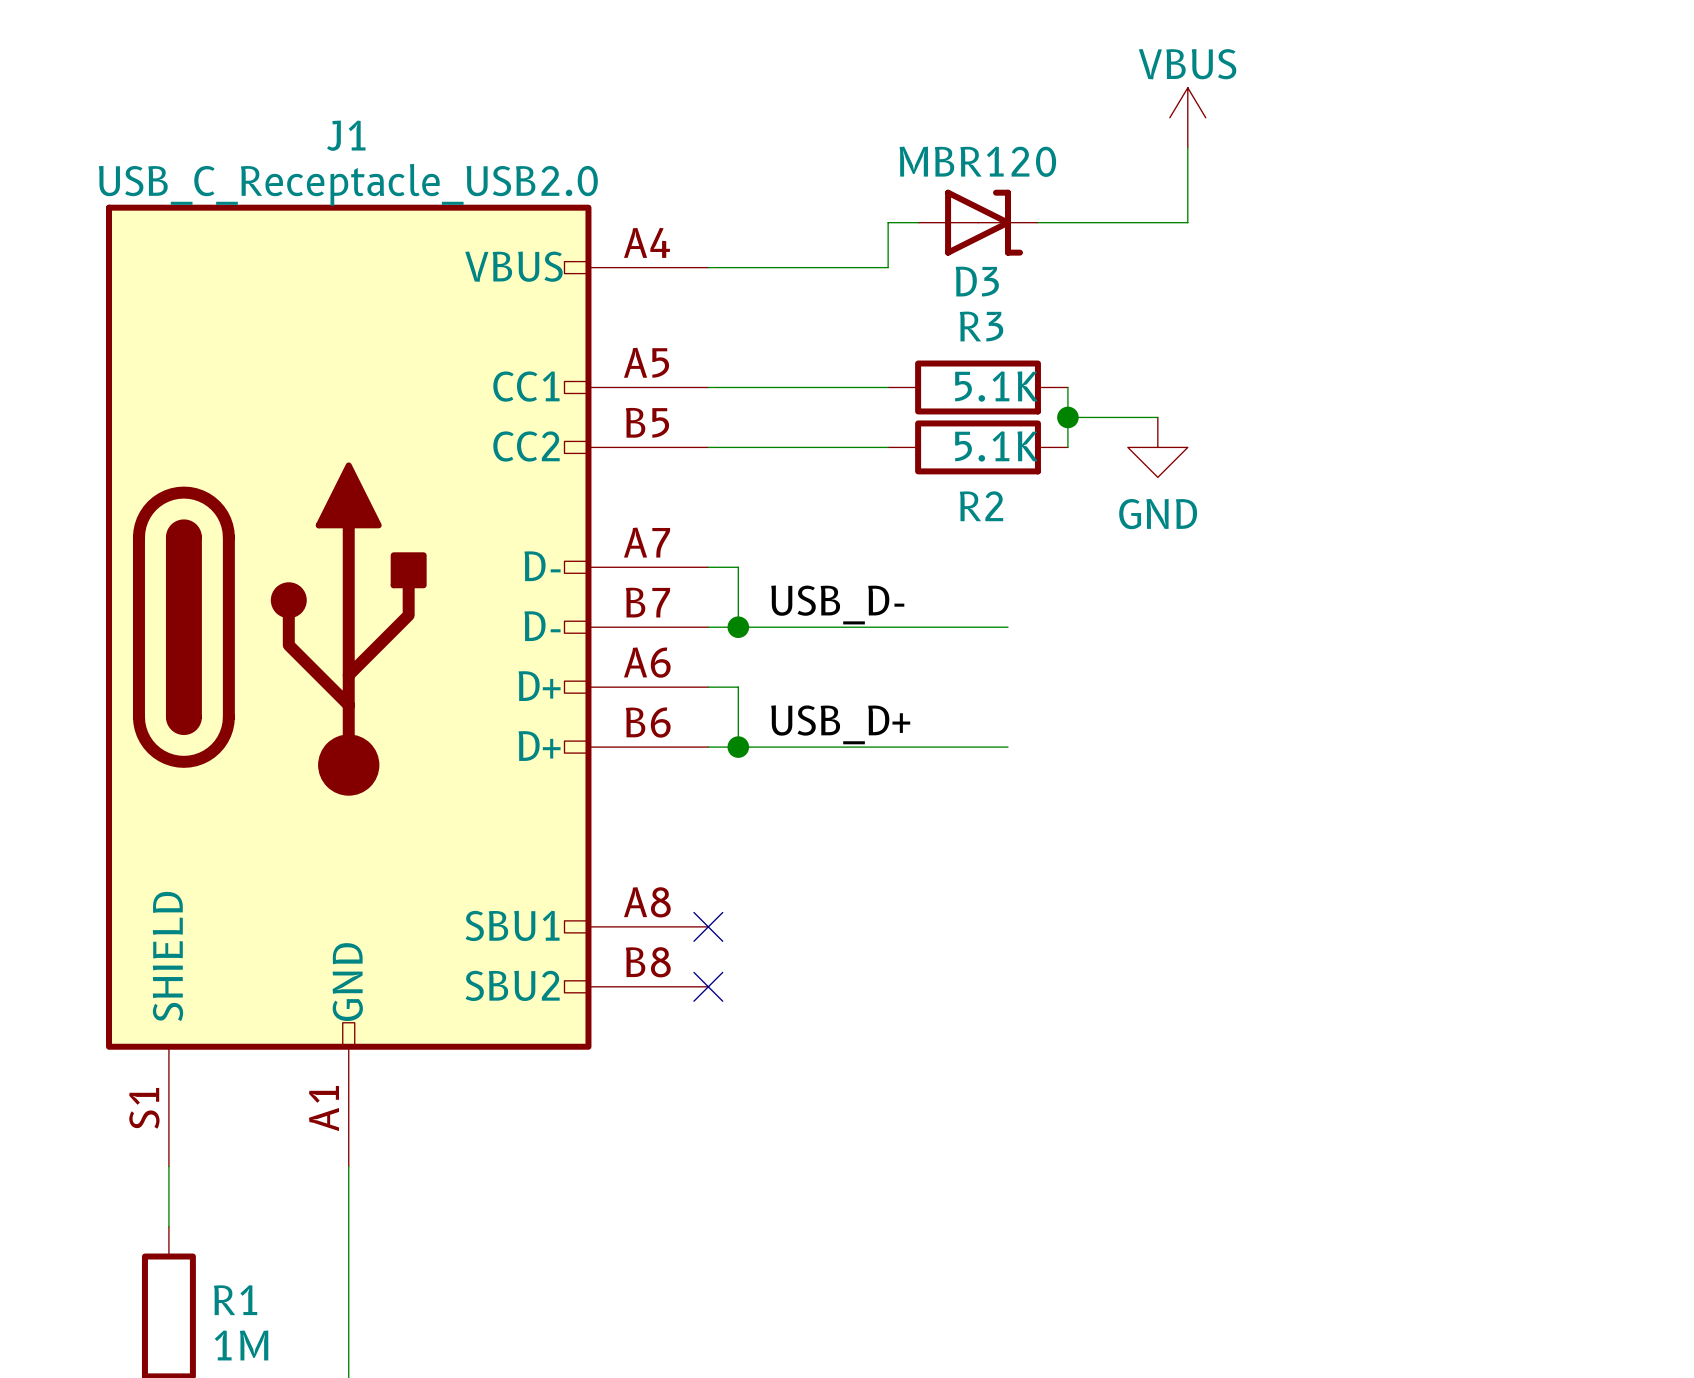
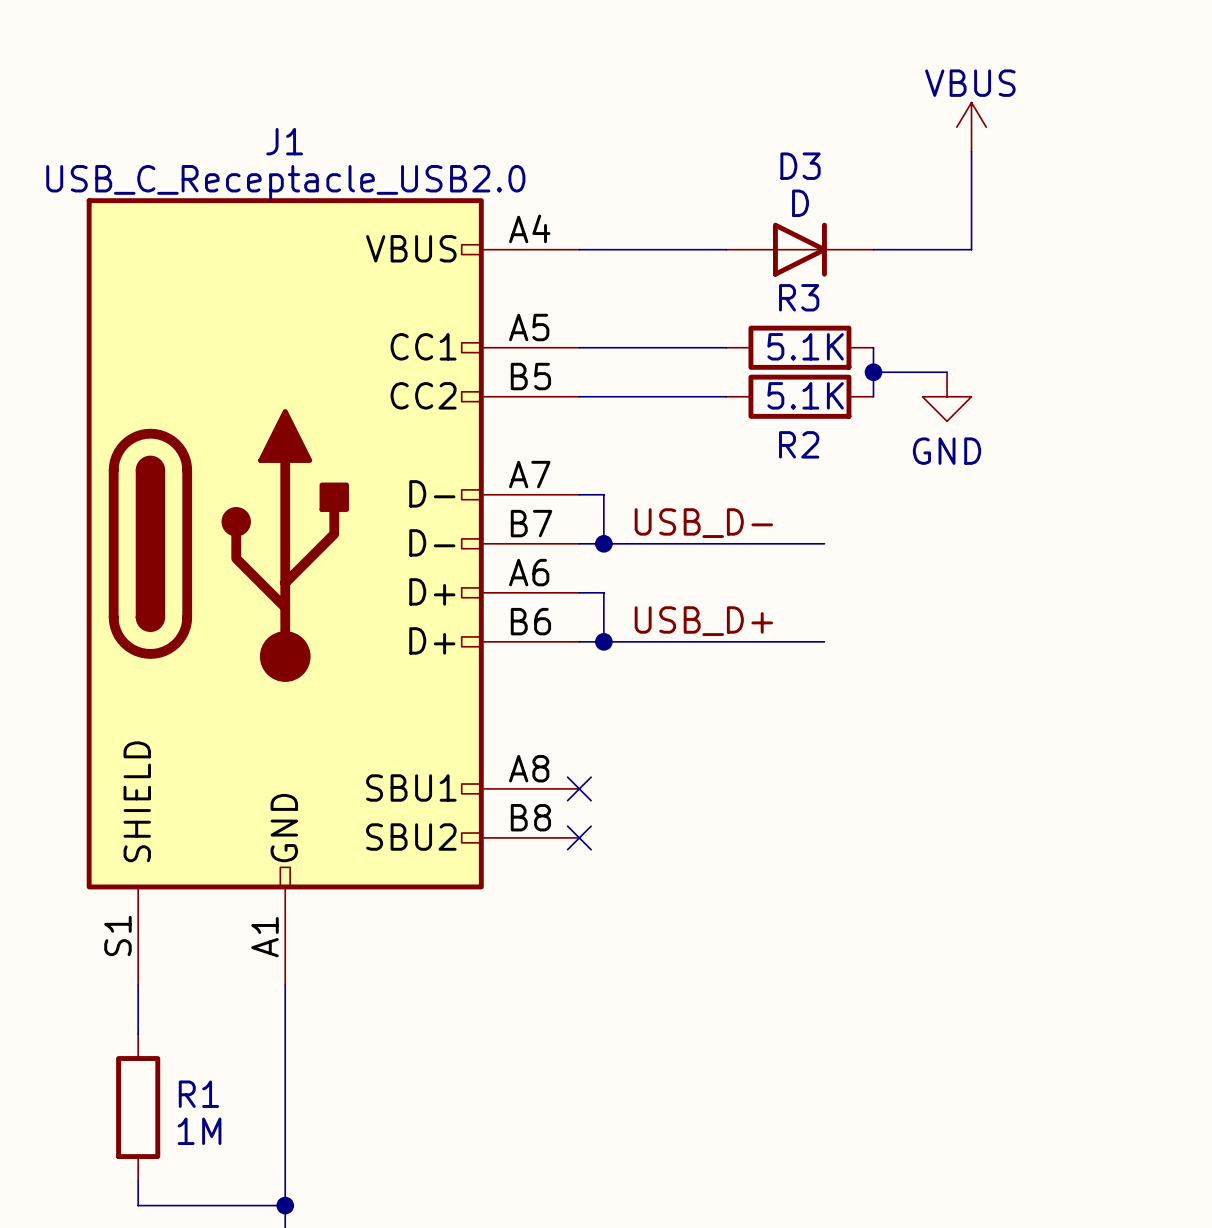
D3 value: MBR120 (977, 161) -> D (800, 203)
D3 symbol: [918, 189, 1038, 256] -> [726, 222, 874, 277]
wire: (918, 222) (888, 222) (888, 267) -> none
wire: (1037, 222) (1187, 222) -> (873, 249) (971, 249) (971, 212)
D3 name position: D3 (977, 281) -> D3 (800, 166)

